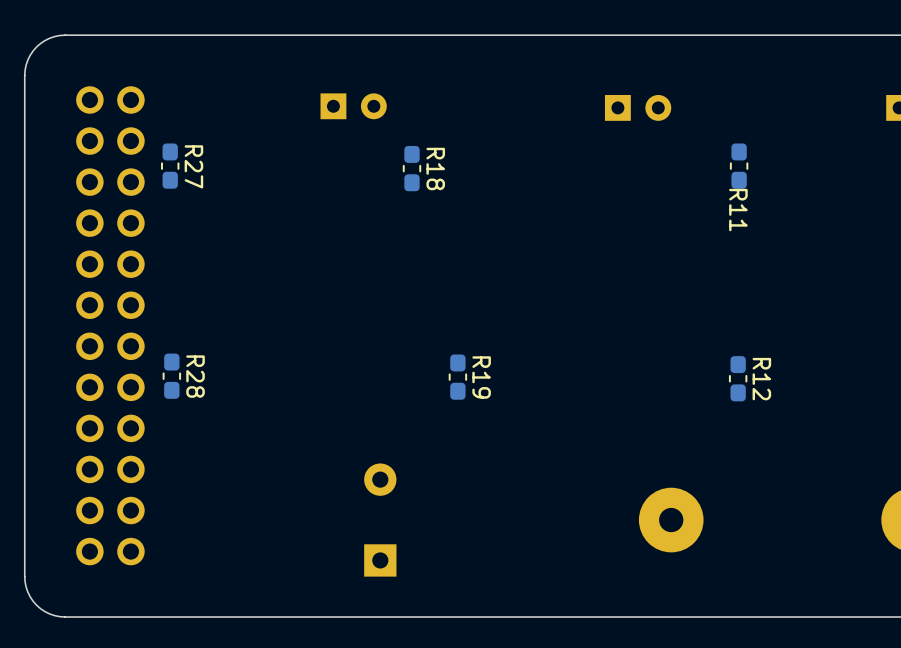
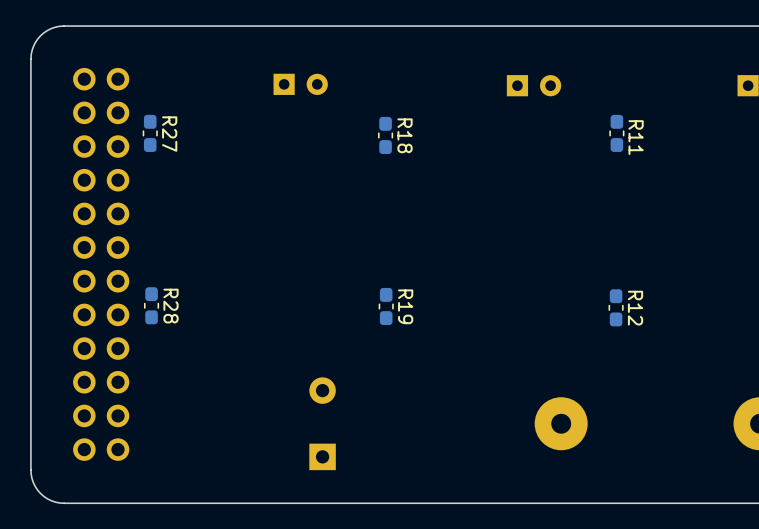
R18 position: (411, 168) -> (385, 135)
R11 name position: R11 (738, 210) -> R11 (636, 137)

